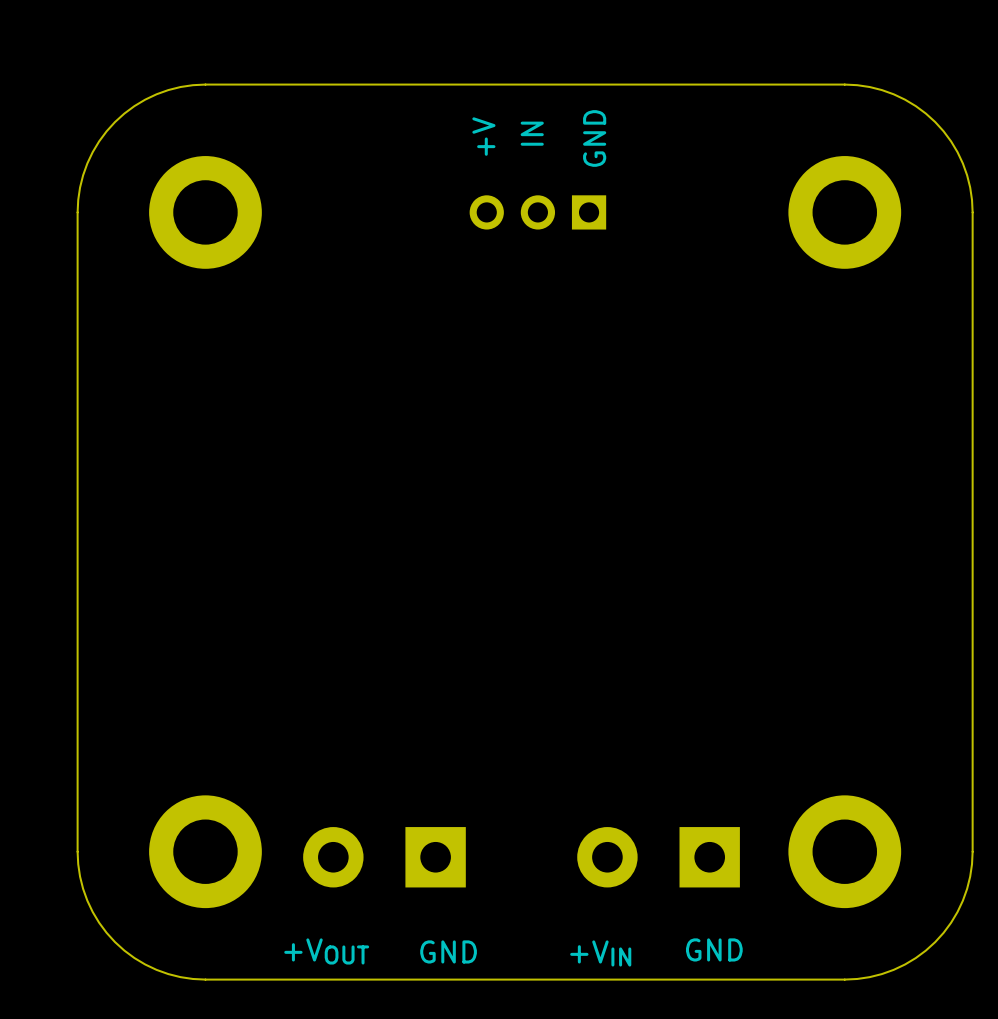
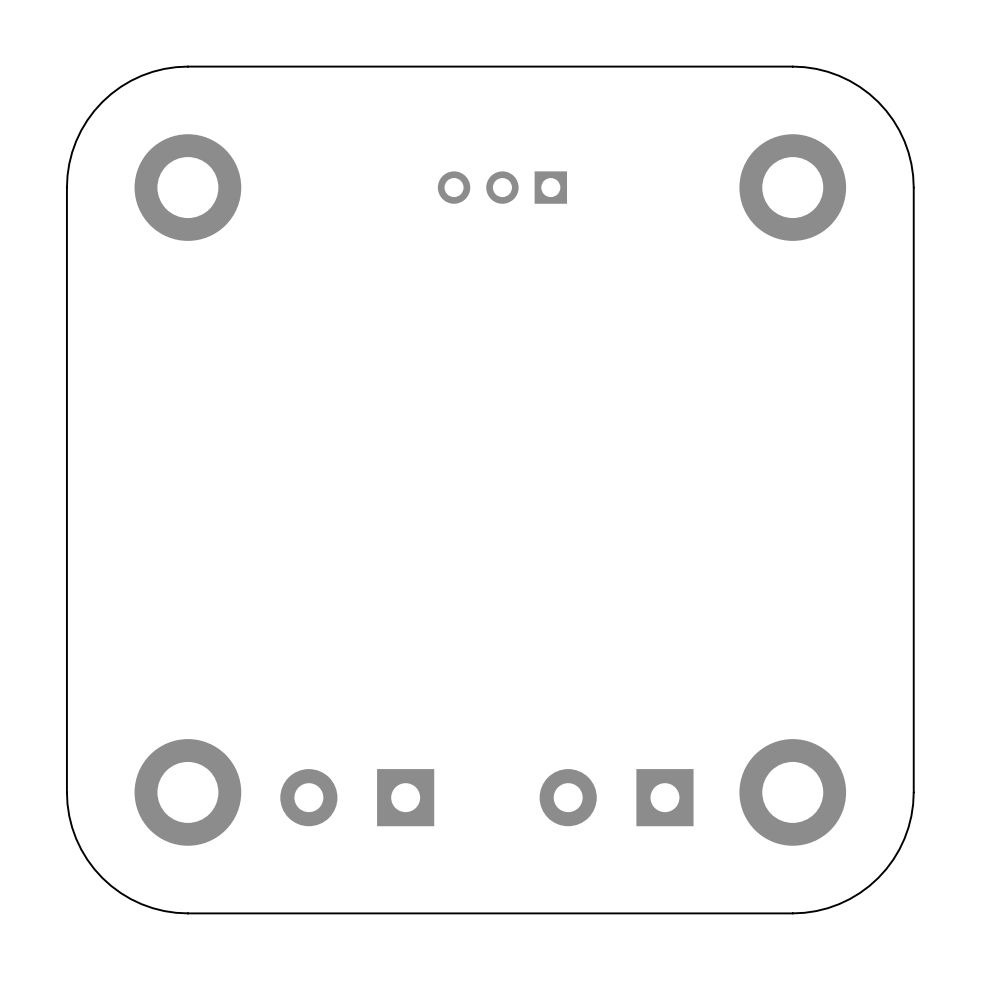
text: IN (532, 133) -> none
text: +V (483, 136) -> none
text: GND (594, 138) -> none
text: GND (714, 949) -> none
text: +VOUT (326, 951) -> none
text: GND (448, 951) -> none
text: +VIN (600, 953) -> none

